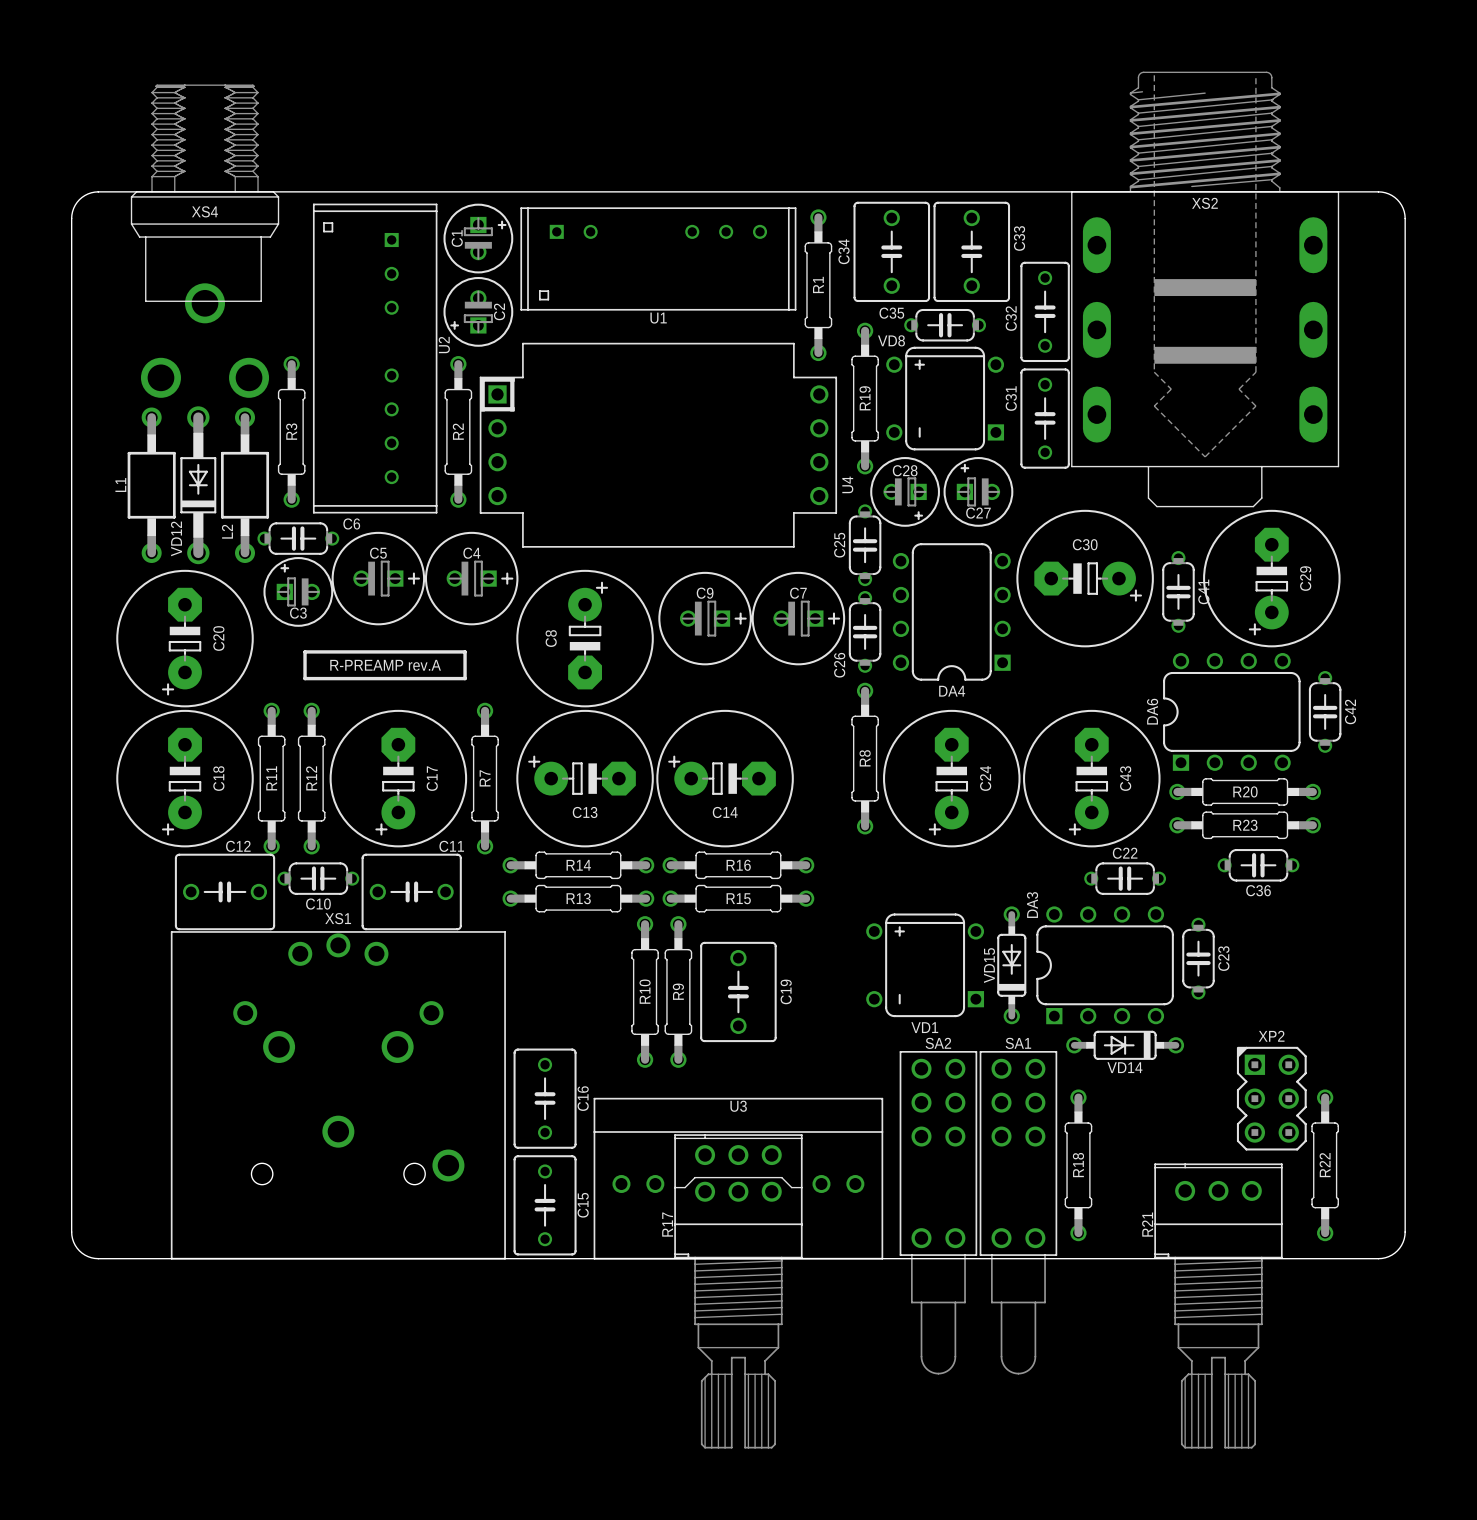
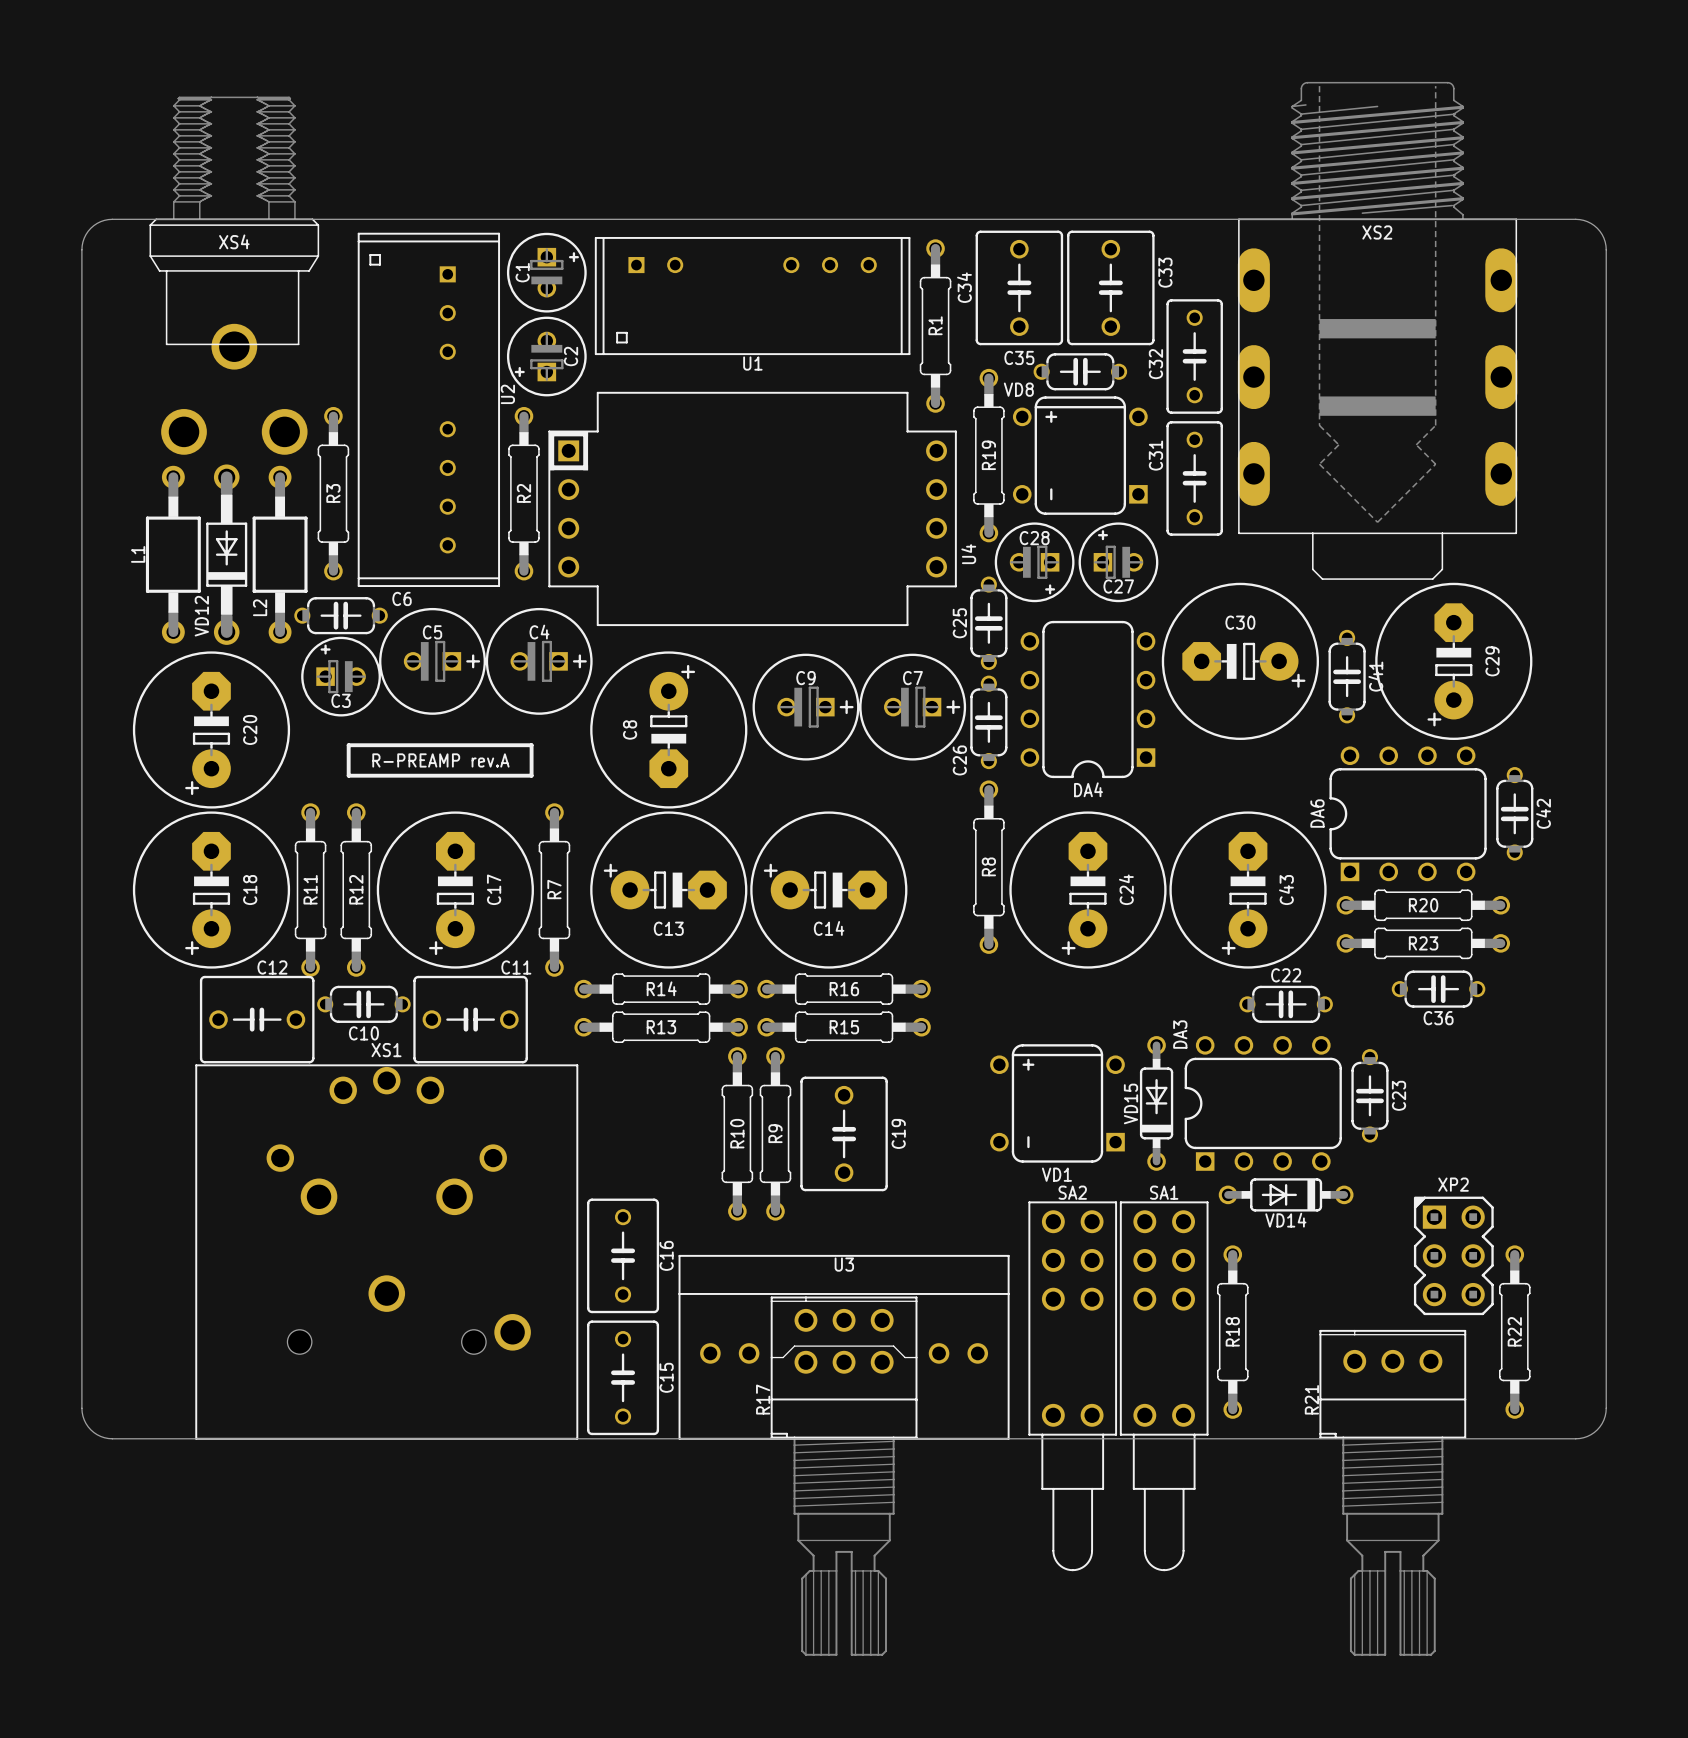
XS2 footprint: [1071, 71, 1340, 508] -> [1237, 81, 1518, 580]
SA2 footprint: [899, 1051, 978, 1375] -> [1028, 1201, 1118, 1572]
SA1 footprint: [979, 1051, 1058, 1375] -> [1119, 1201, 1209, 1572]

